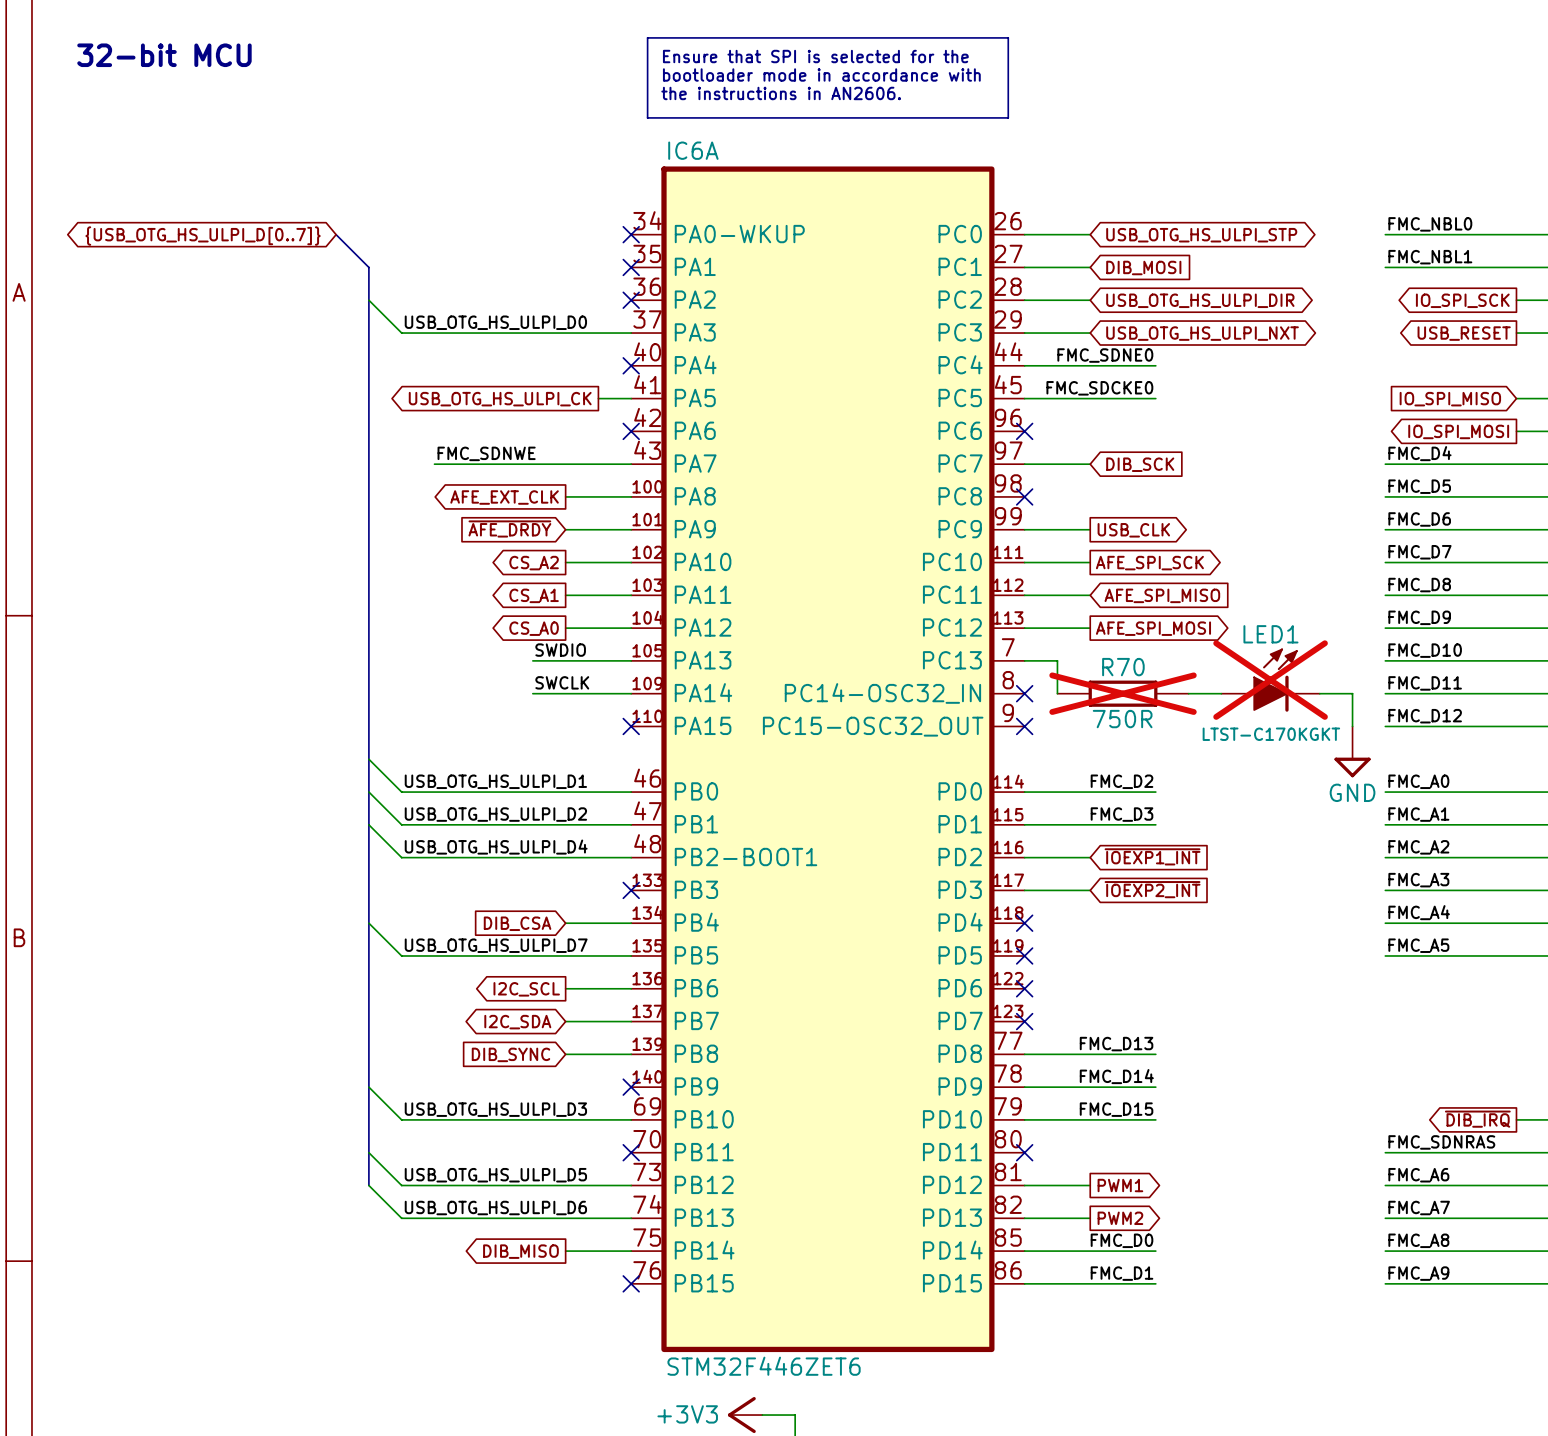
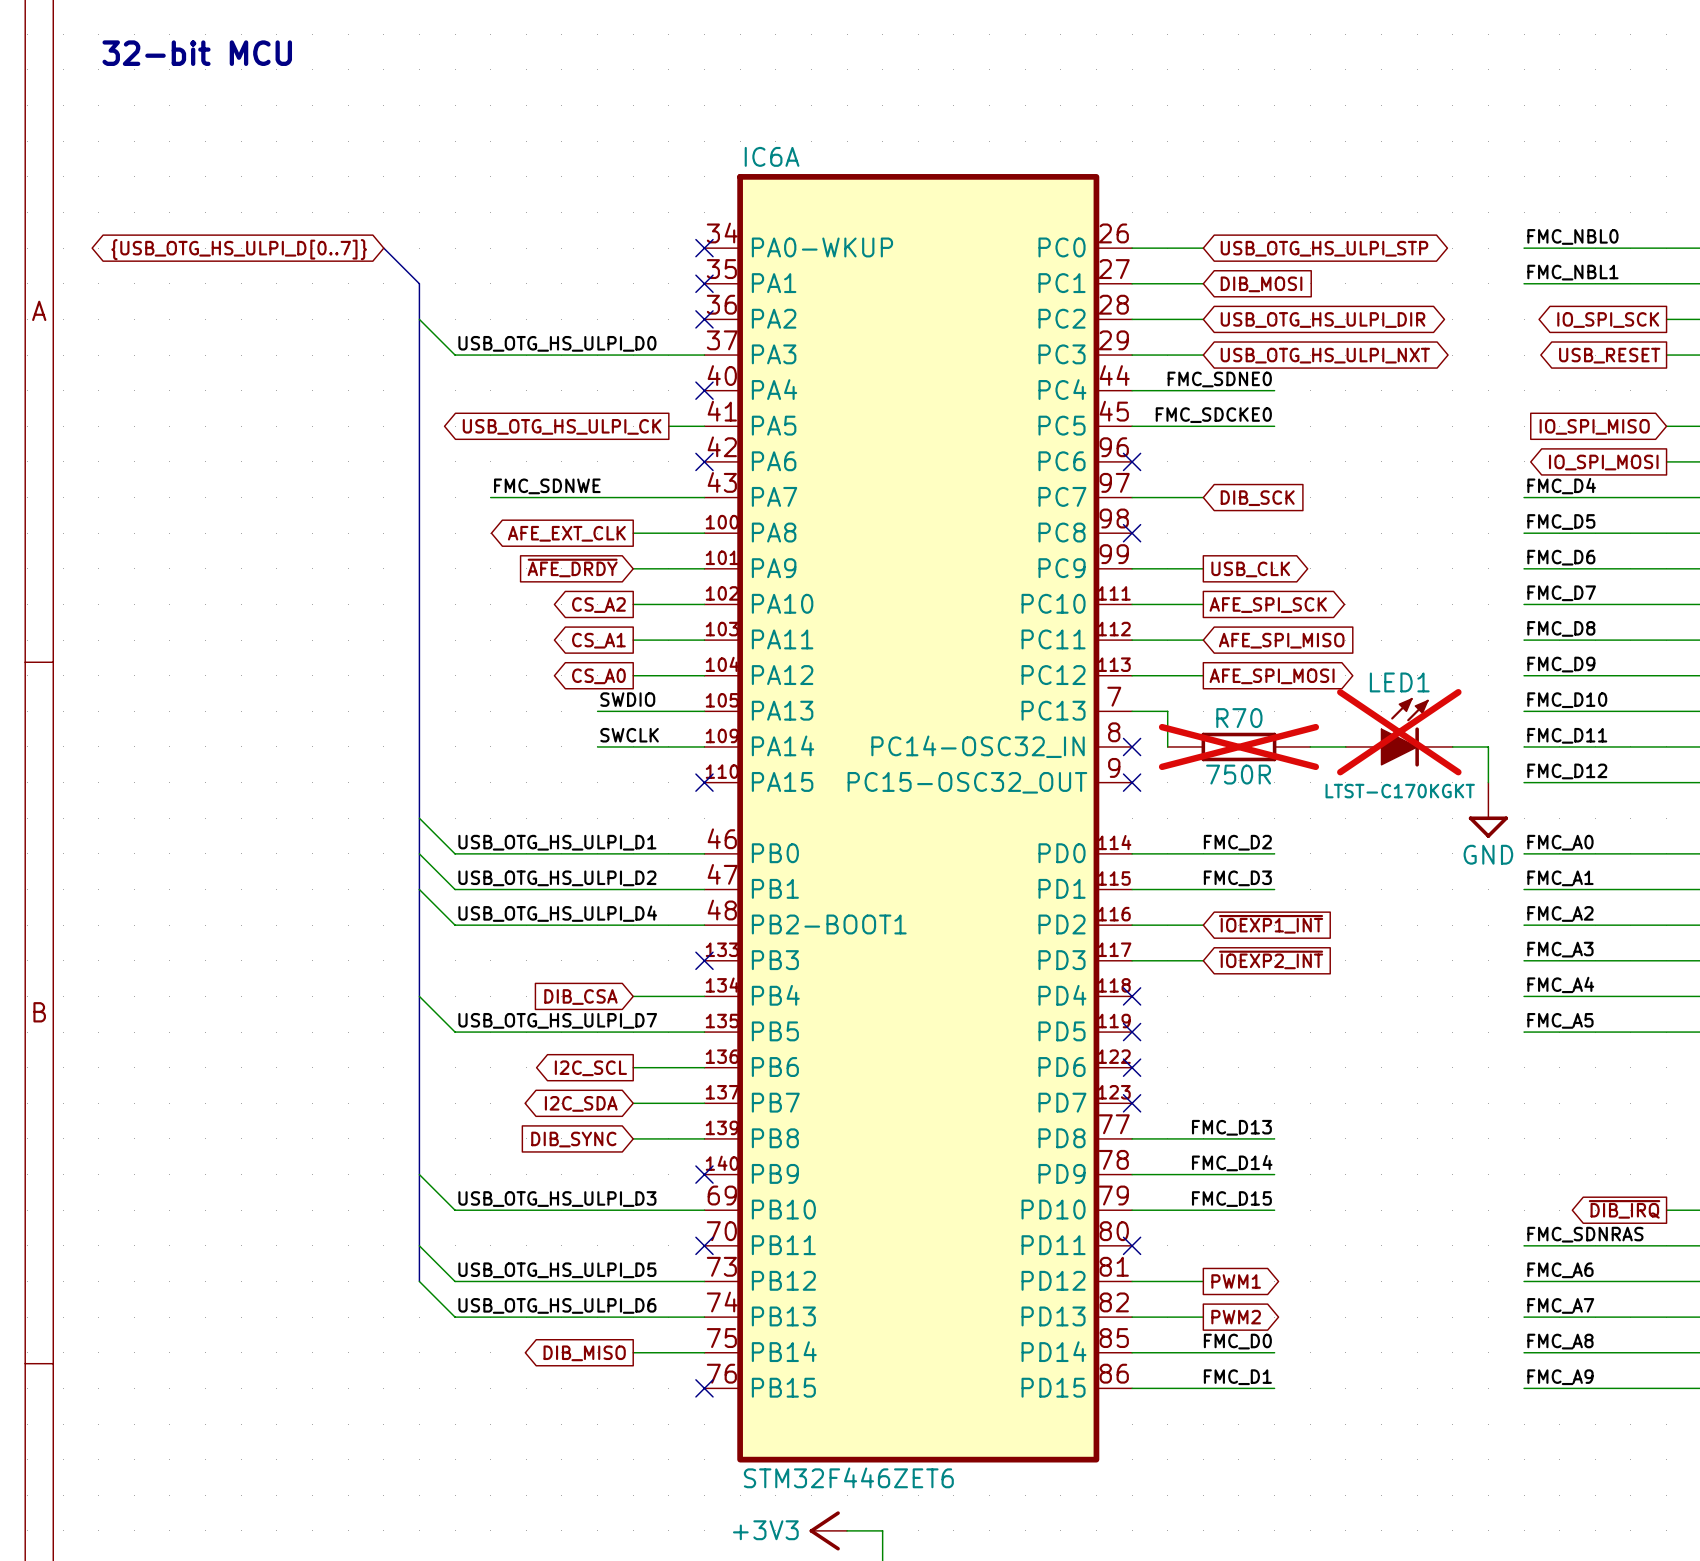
line: (647, 37) (1008, 37) (1008, 117) (647, 117) (647, 37) -> none
text: Ensure that SPI is selected for the (815, 56) -> none
text: bootloader mode in accordance with (821, 74) -> none
text: the instructions in AN2606. (781, 93) -> none

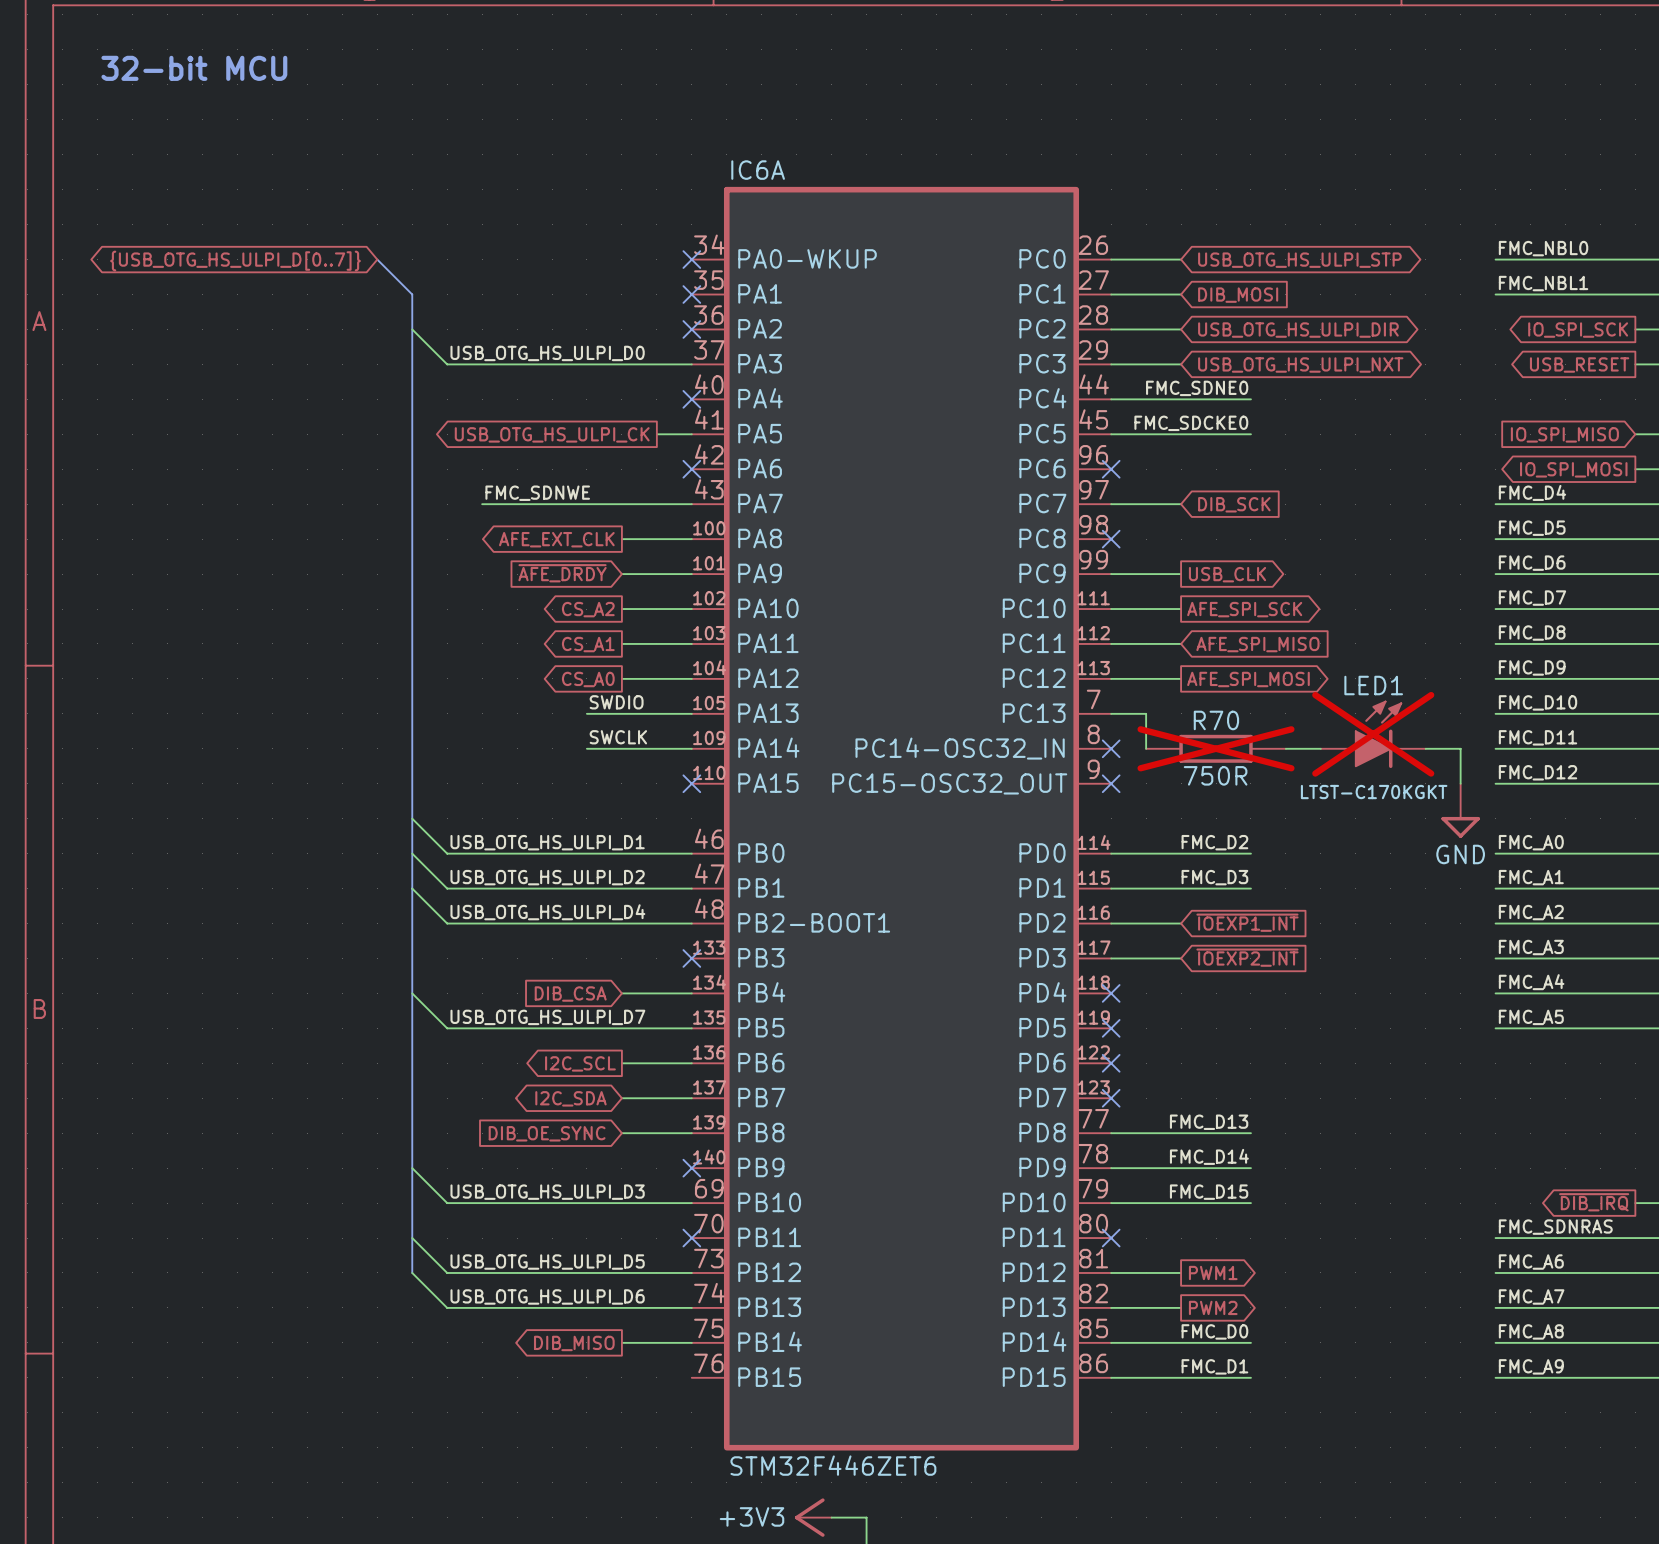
global label: DIB_SYNC (573, 1139) -> DIB_OE_SYNC (547, 1133)
no-connect mark: (704, 1388) -> none

